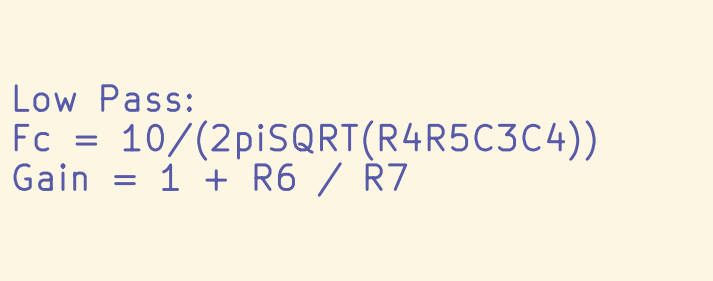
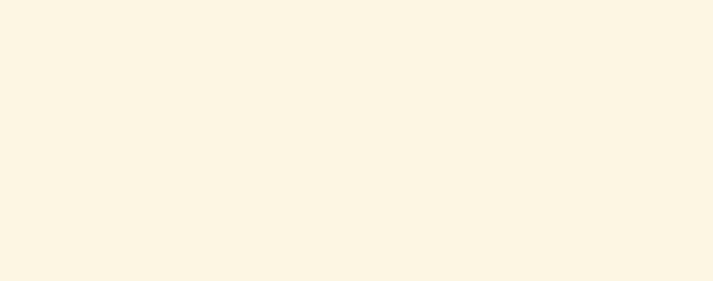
text: Low Pass: (103, 98) -> none
text: Fc = 10/(2piSQRT(R4R5C3C4)) (305, 140) -> none
text: Gain = 1 + R6 / R7 (210, 179) -> none

